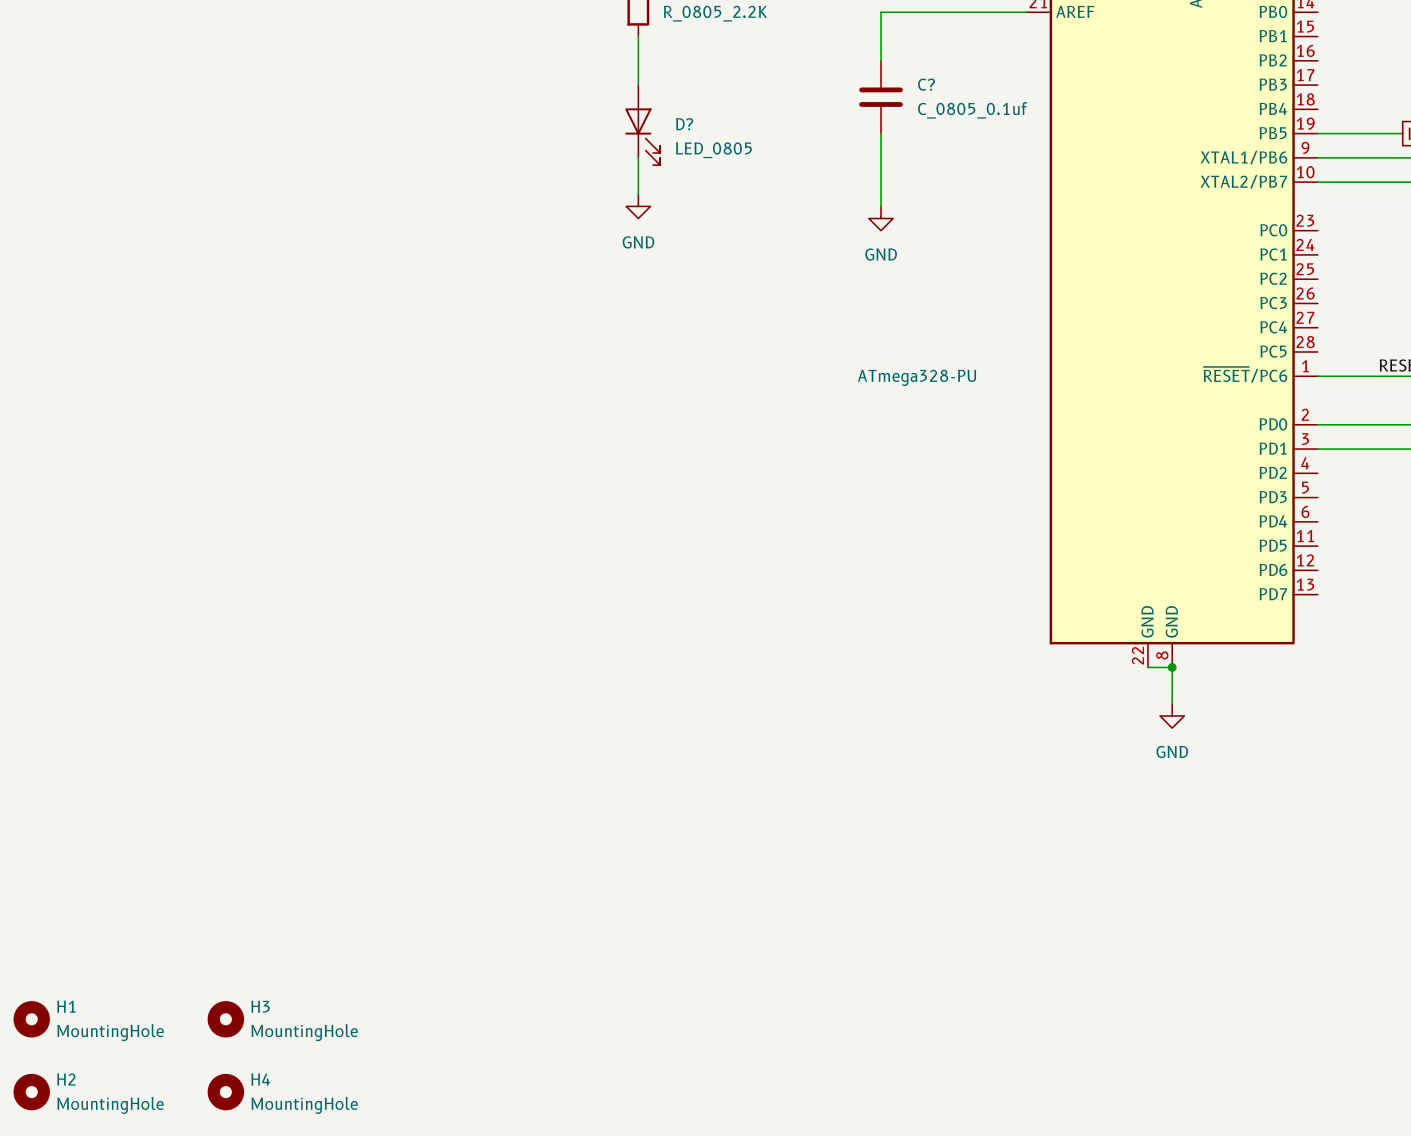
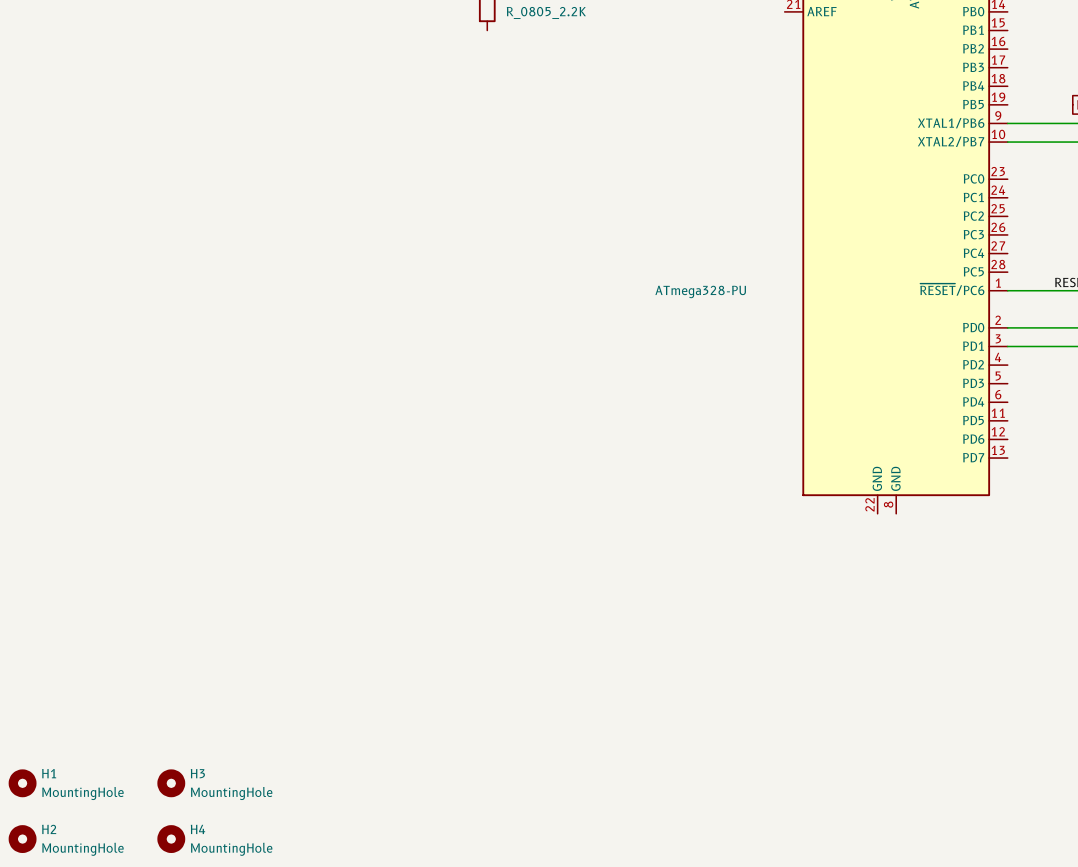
wire: (1026, 12) (881, 12) (881, 60) -> none
wire: (638, 36) (638, 85) -> none
C?: C_0805_0.1uf (881, 97) -> none
D?: LED_0805 (642, 125) -> none
wire: (881, 133) (881, 206) -> none
wire: (1317, 133) (1402, 133) -> none
wire: (638, 157) (638, 194) -> none
power symbol: GND (638, 206) -> none
power symbol: GND (881, 218) -> none
wire: (1147, 667) (1172, 667) (1172, 703) -> none
junction: (1172, 667) -> none
power symbol: GND (1172, 715) -> none

